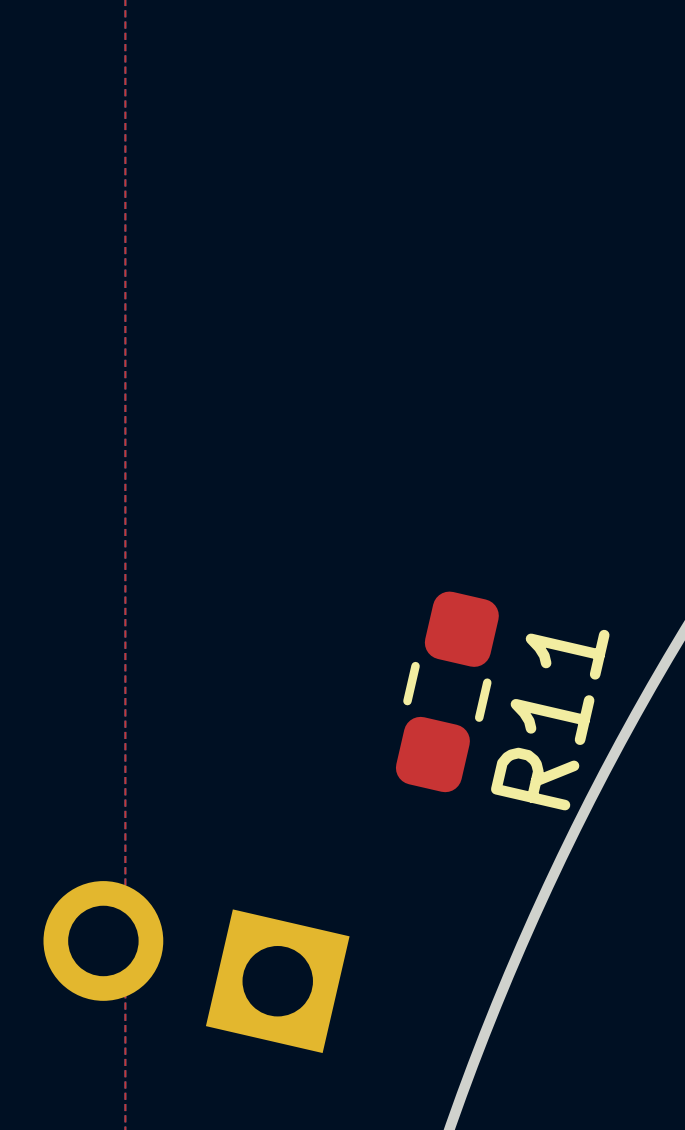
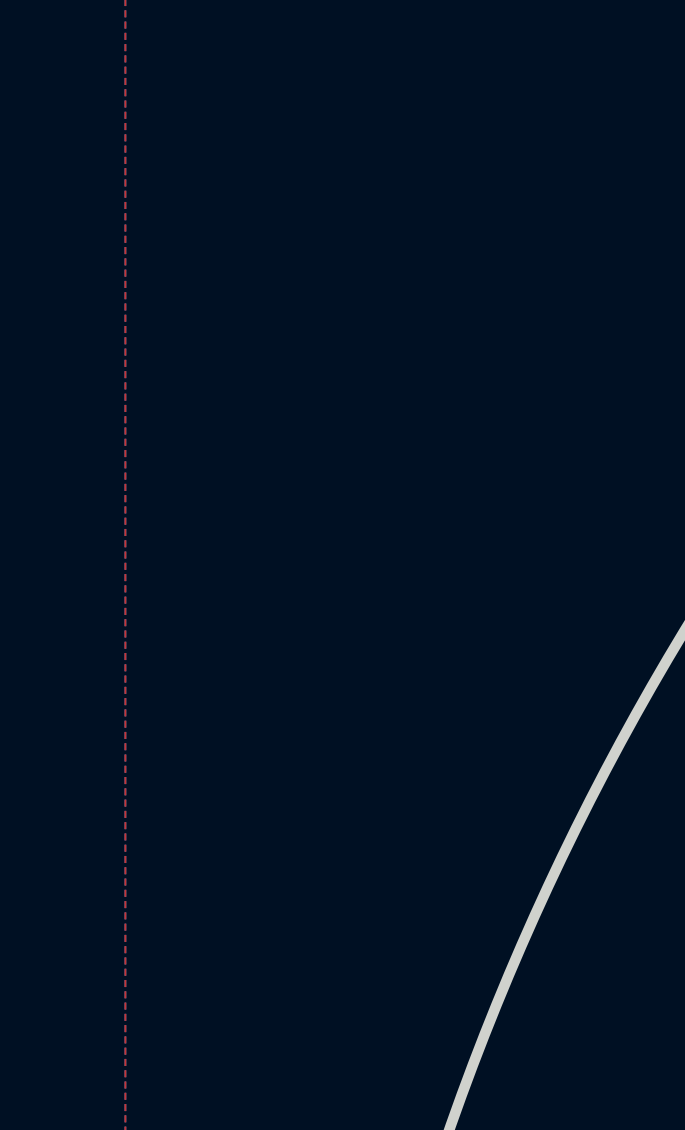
R11: (447, 691) -> none
part: (196, 967) -> none

